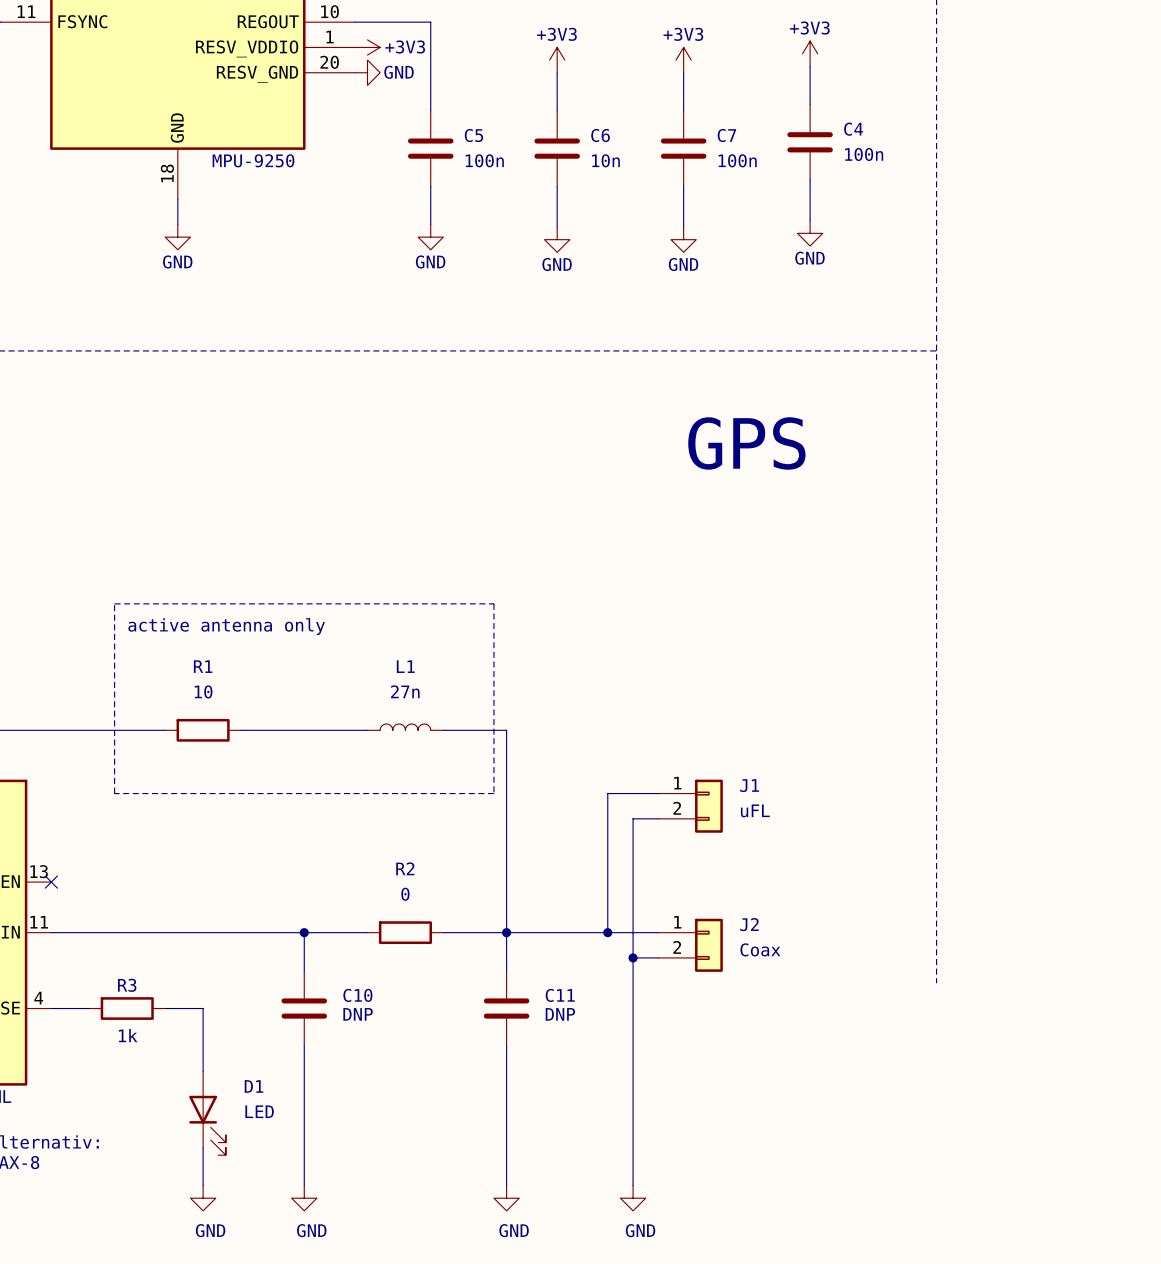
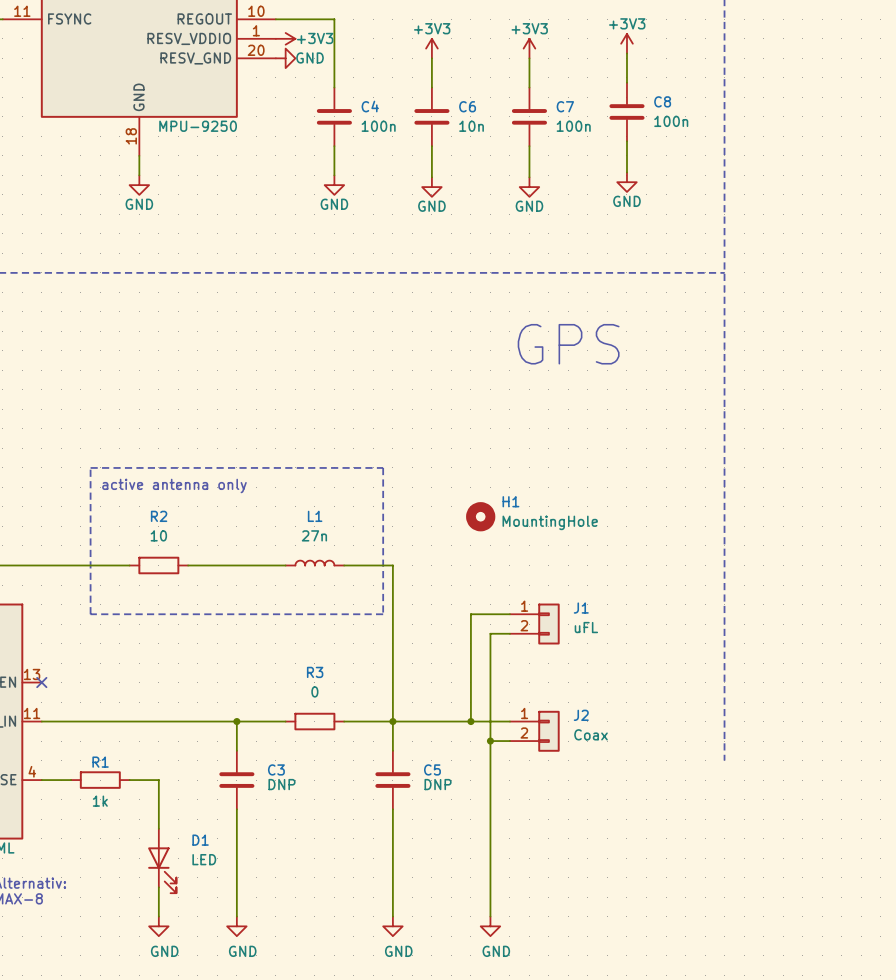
C4 name: C4 (853, 129) -> C8 (662, 101)
C5 name: C5 (473, 135) -> C4 (370, 106)
R1 name: R1 (203, 666) -> R2 (159, 516)
H1: none -> MountingHole (480, 516)
R2 name: R2 (405, 868) -> R3 (315, 672)
R3 name: R3 (127, 985) -> R1 (100, 762)
C10 name: C10 (357, 995) -> C3 (276, 769)
C11 name: C11 (560, 995) -> C5 (432, 769)

